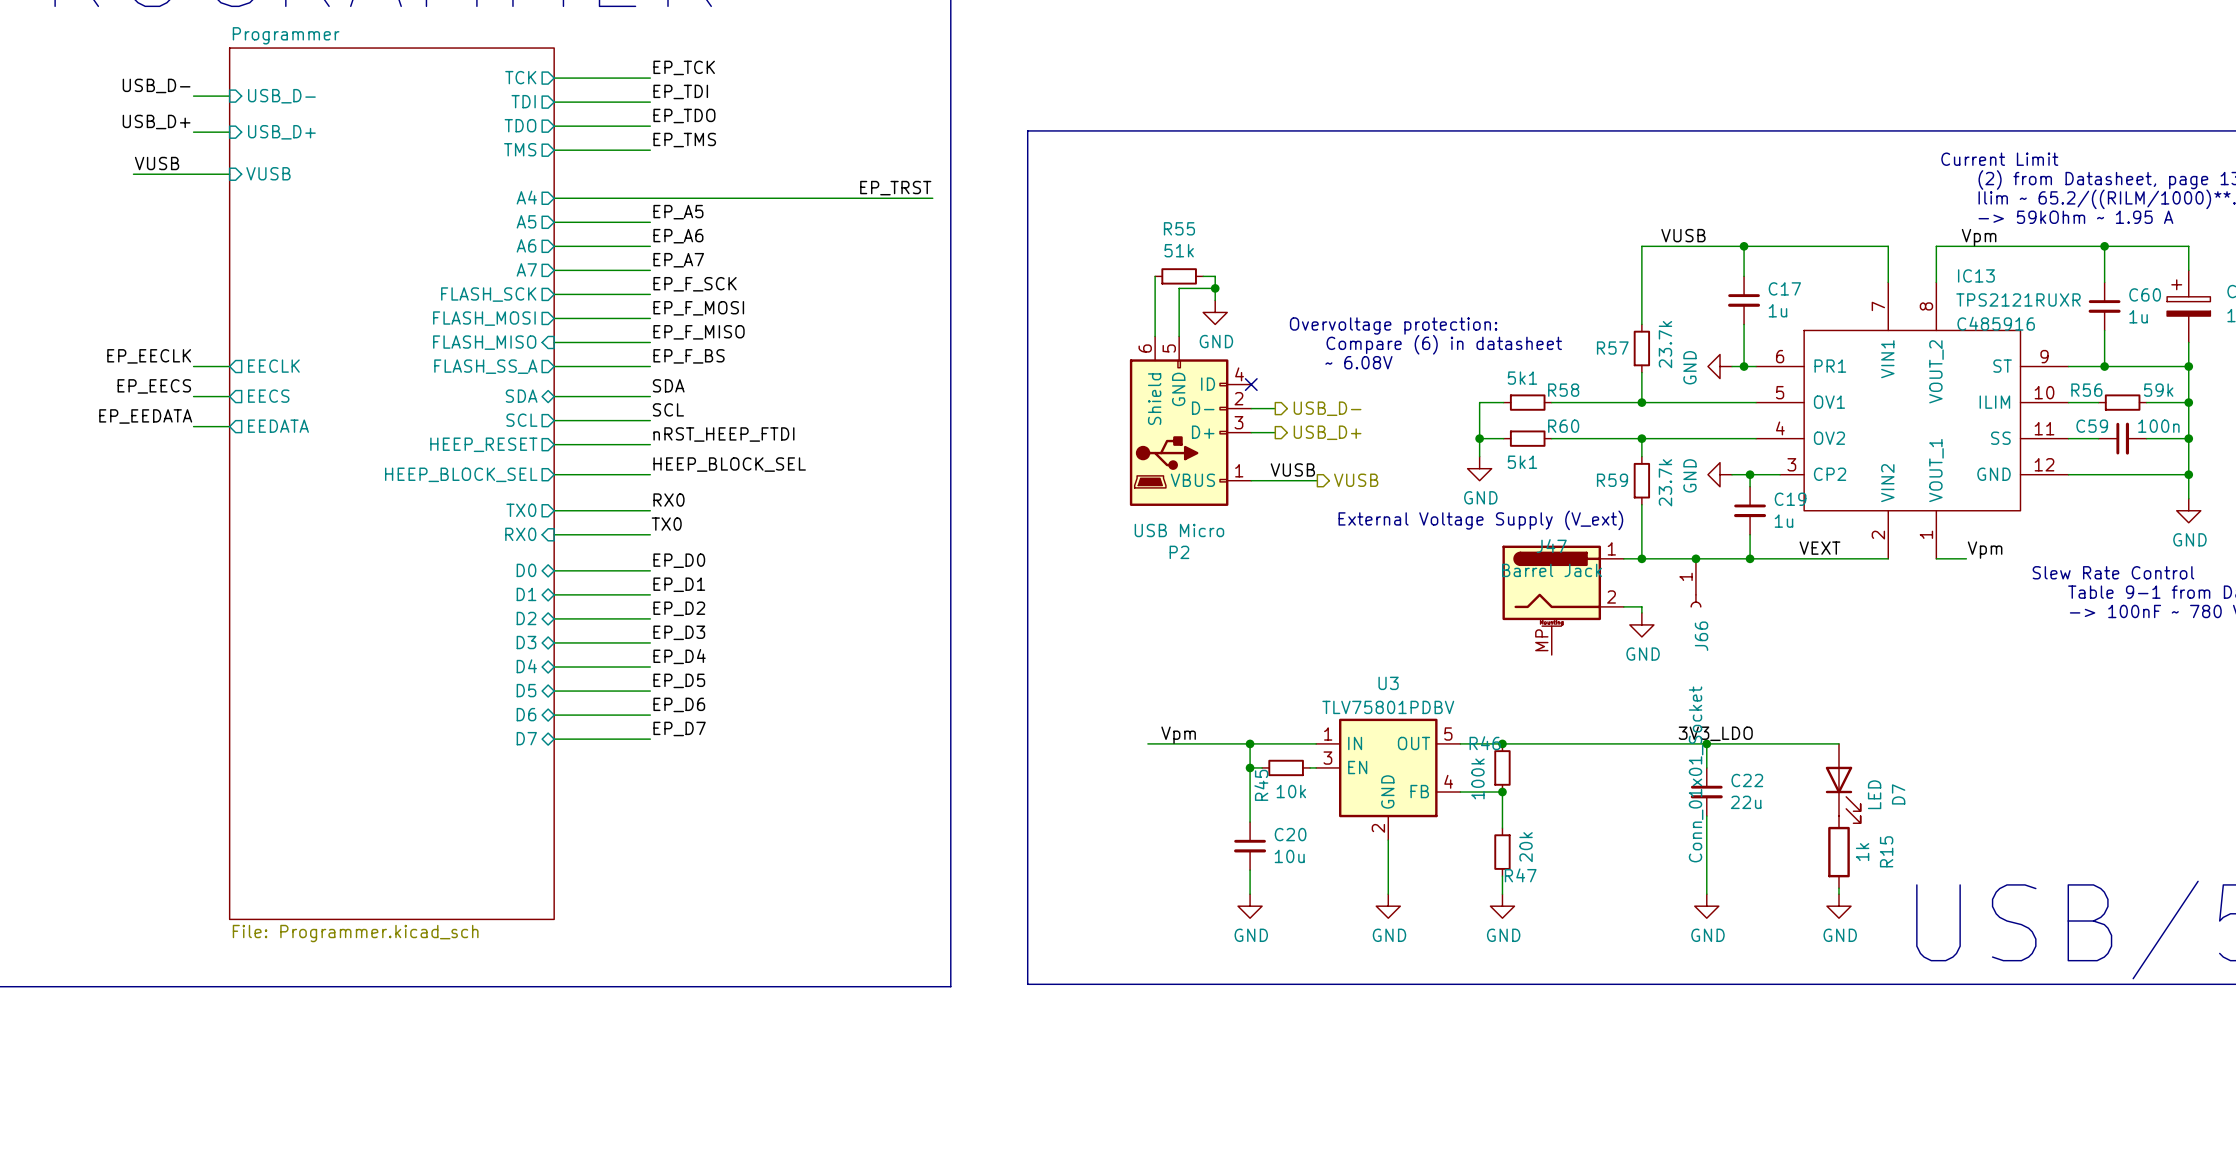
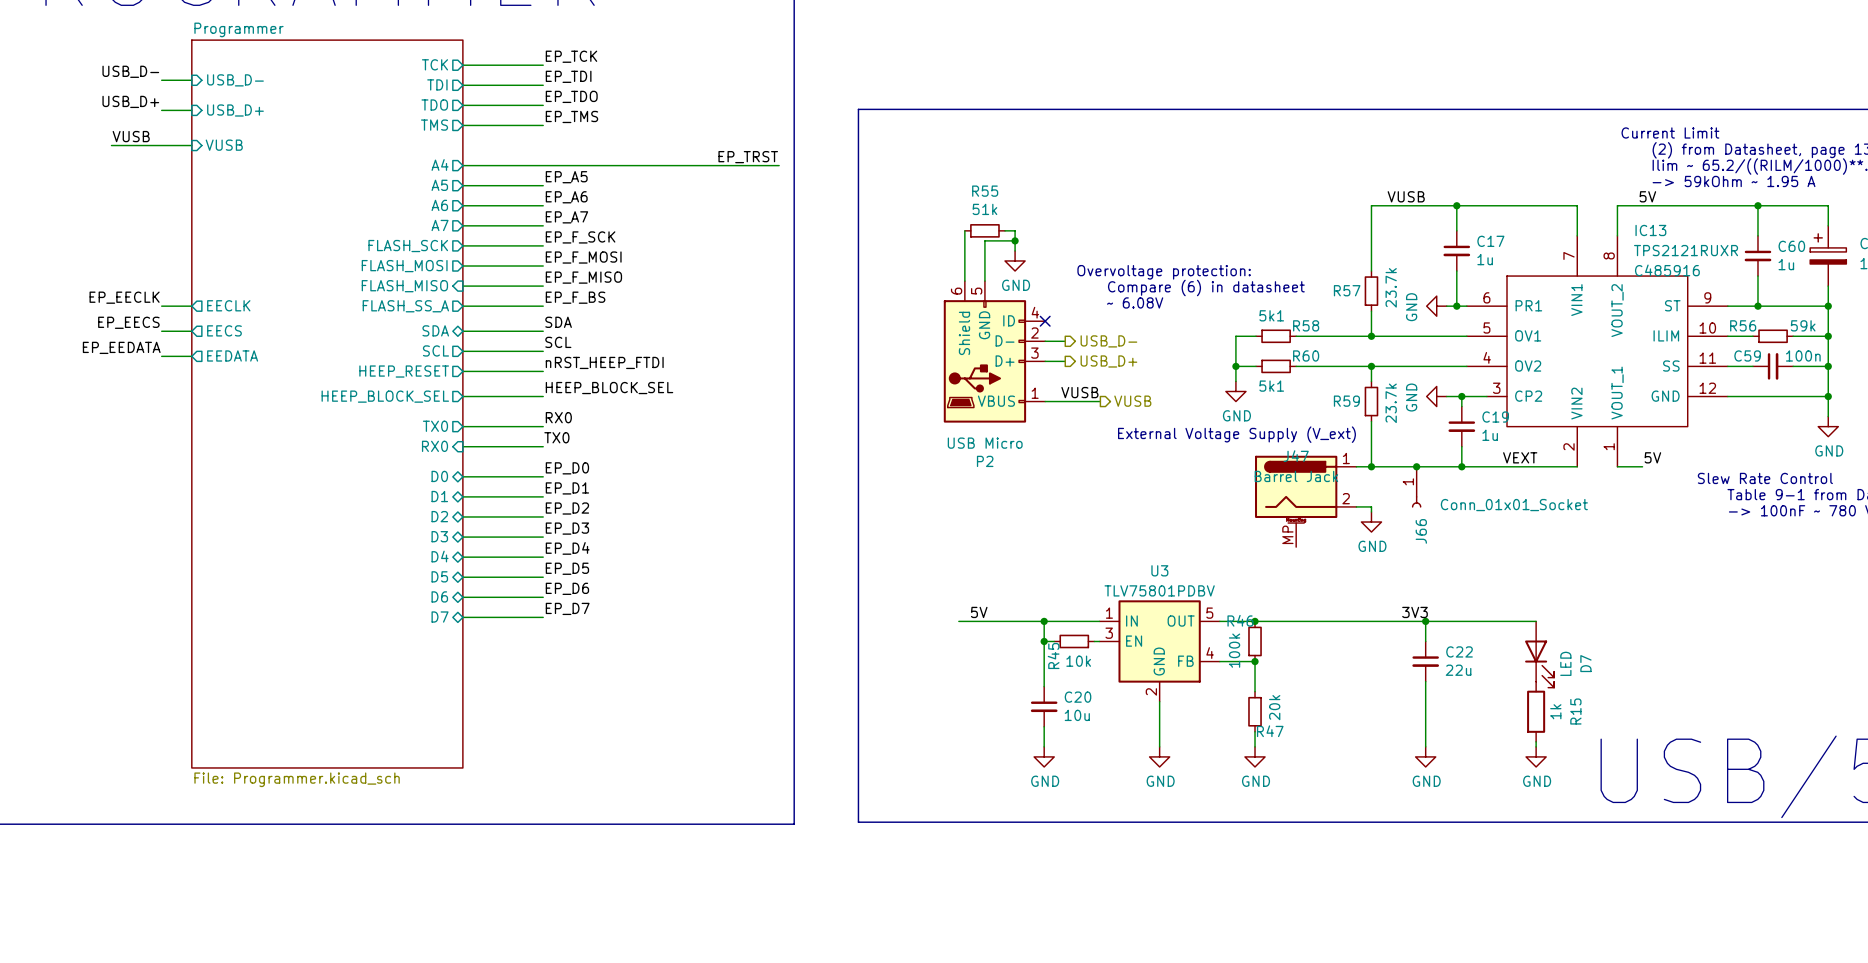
label: Vpm (1979, 237) -> 5V (1647, 196)
label: Vpm (1985, 550) -> 5V (1652, 457)
label: 3V3_LDO (1715, 733) -> 3V3 (1415, 612)
label: Vpm (1178, 735) -> 5V (979, 612)
J66 value rotation: 0° (1696, 774) -> 90° clockwise (1514, 505)
J66 value position: Conn_01x01_Socket (1696, 774) -> Conn_01x01_Socket (1514, 505)

